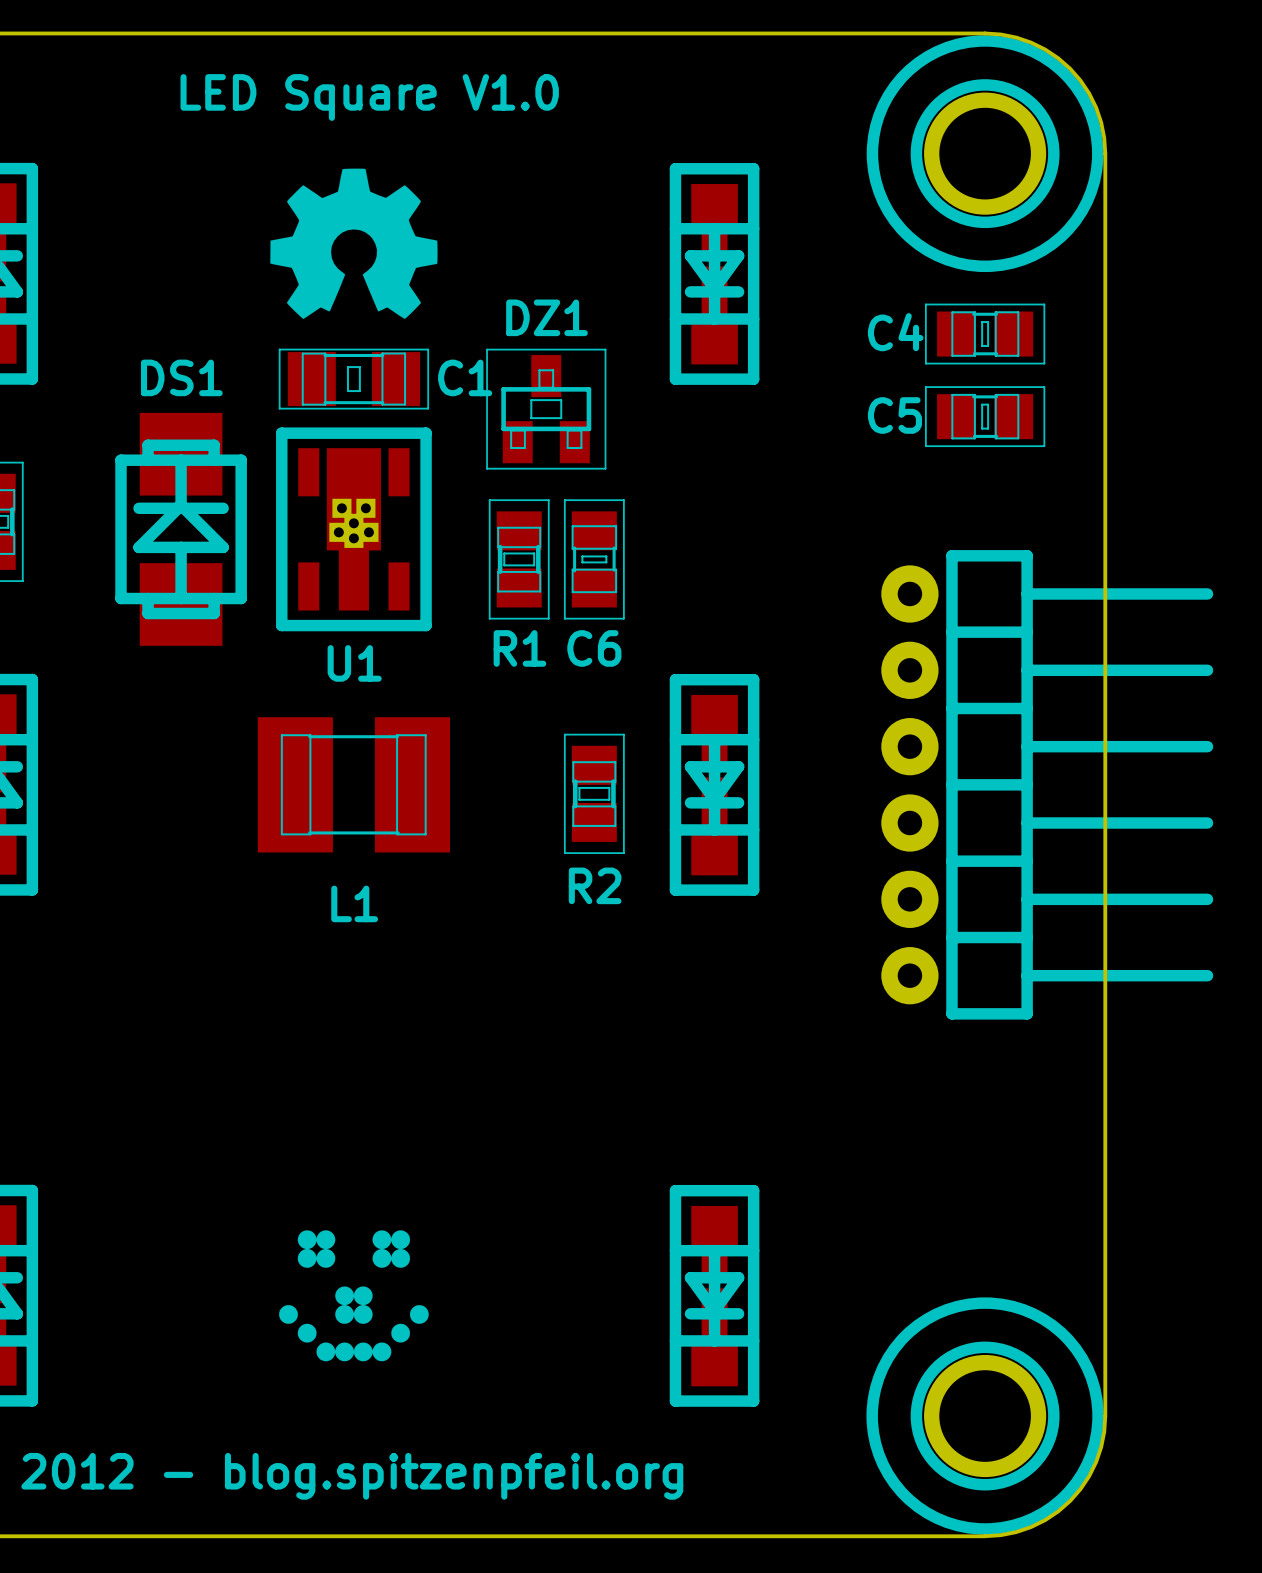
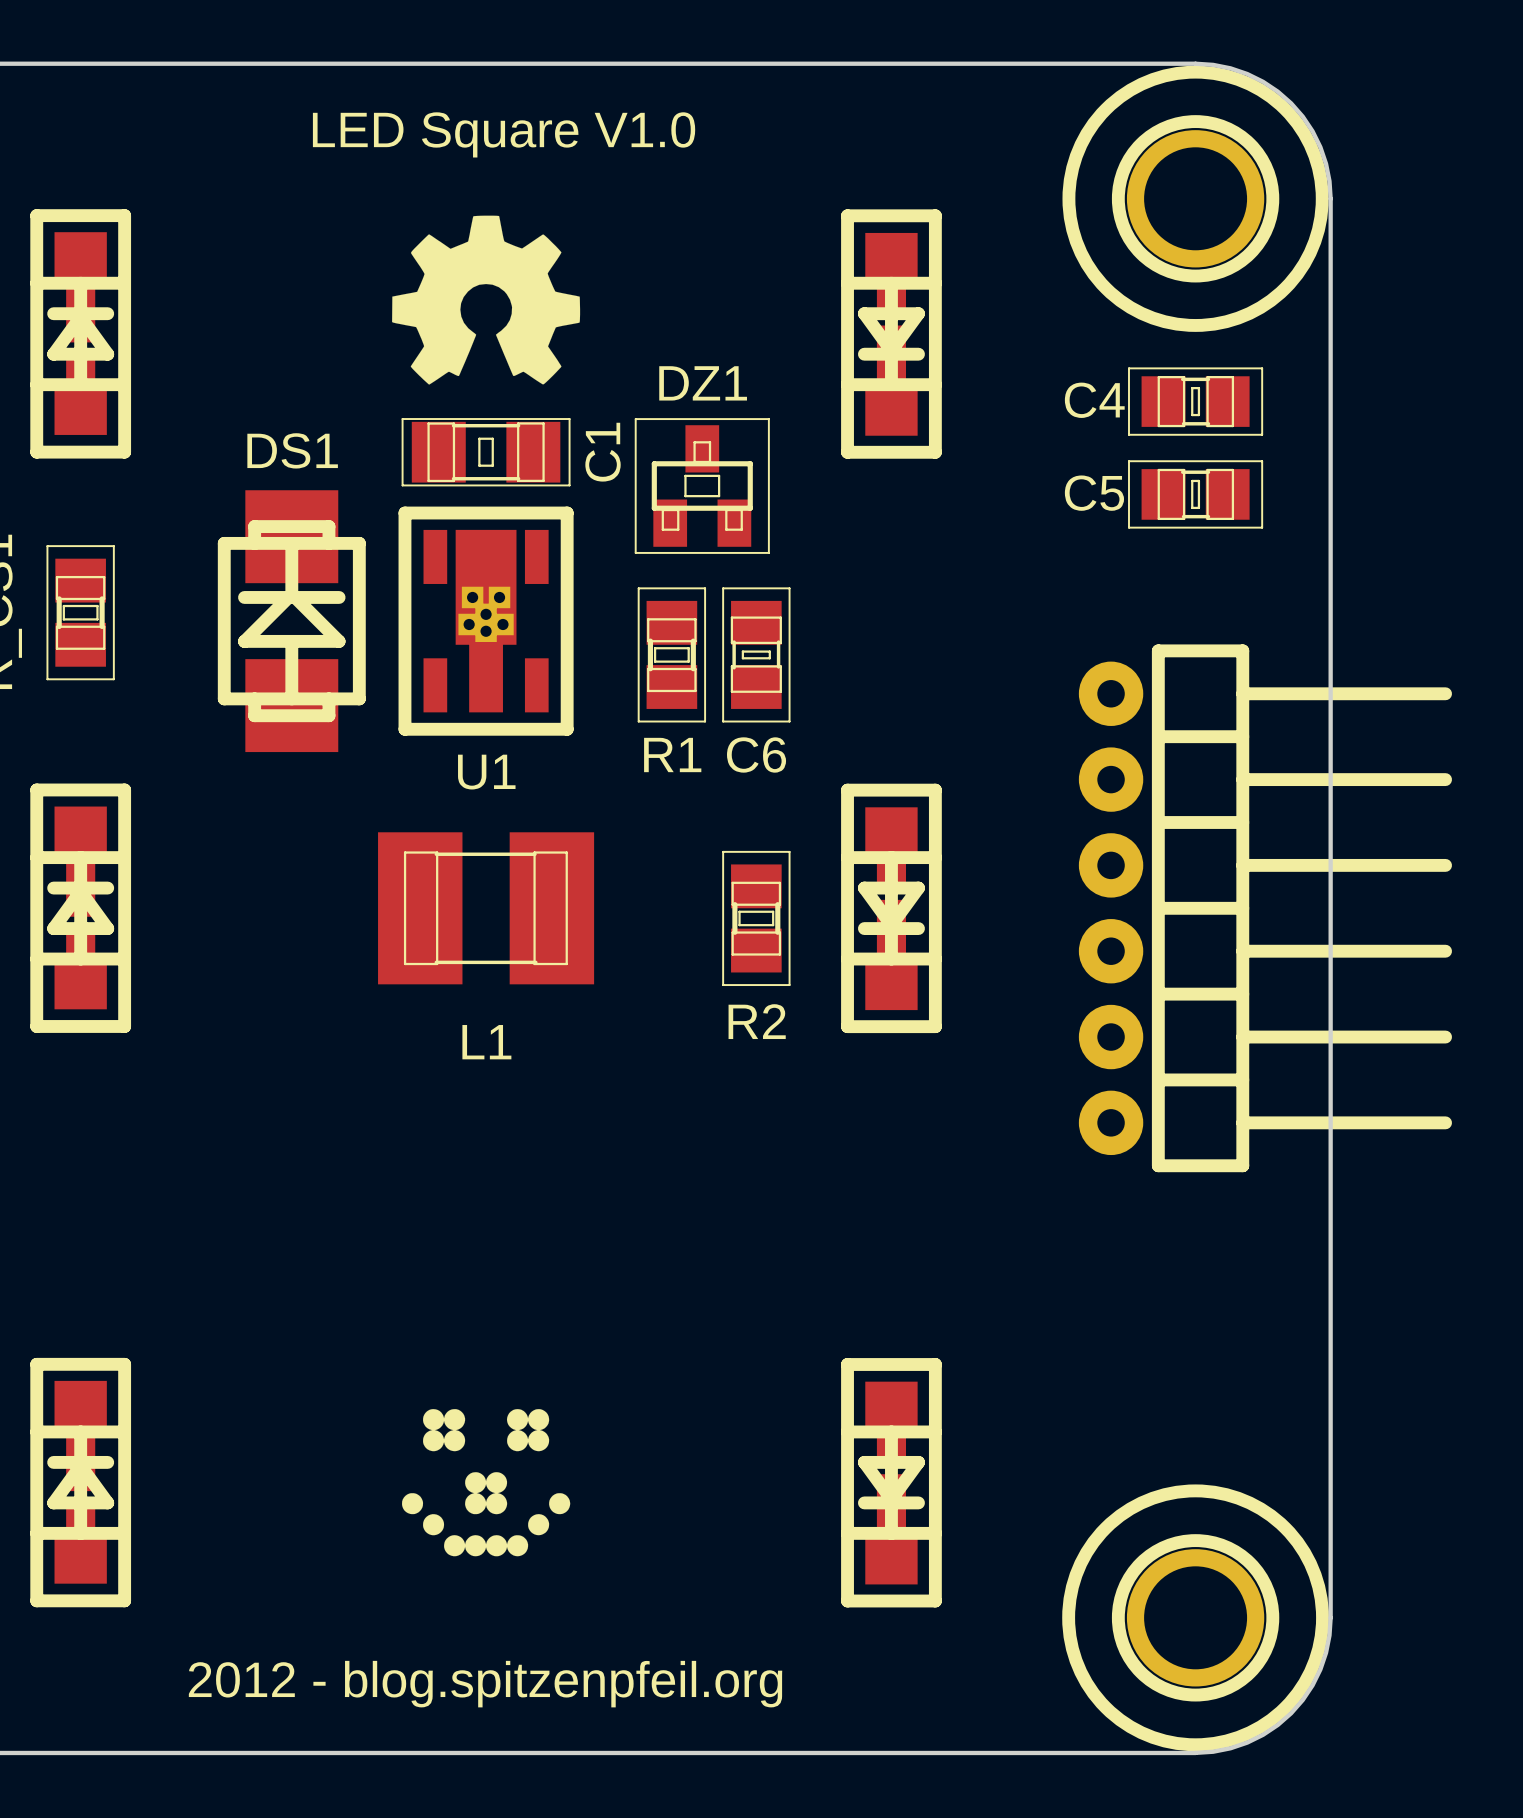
C1 name rotation: 0° (465, 377) -> 90° counterclockwise (603, 452)

